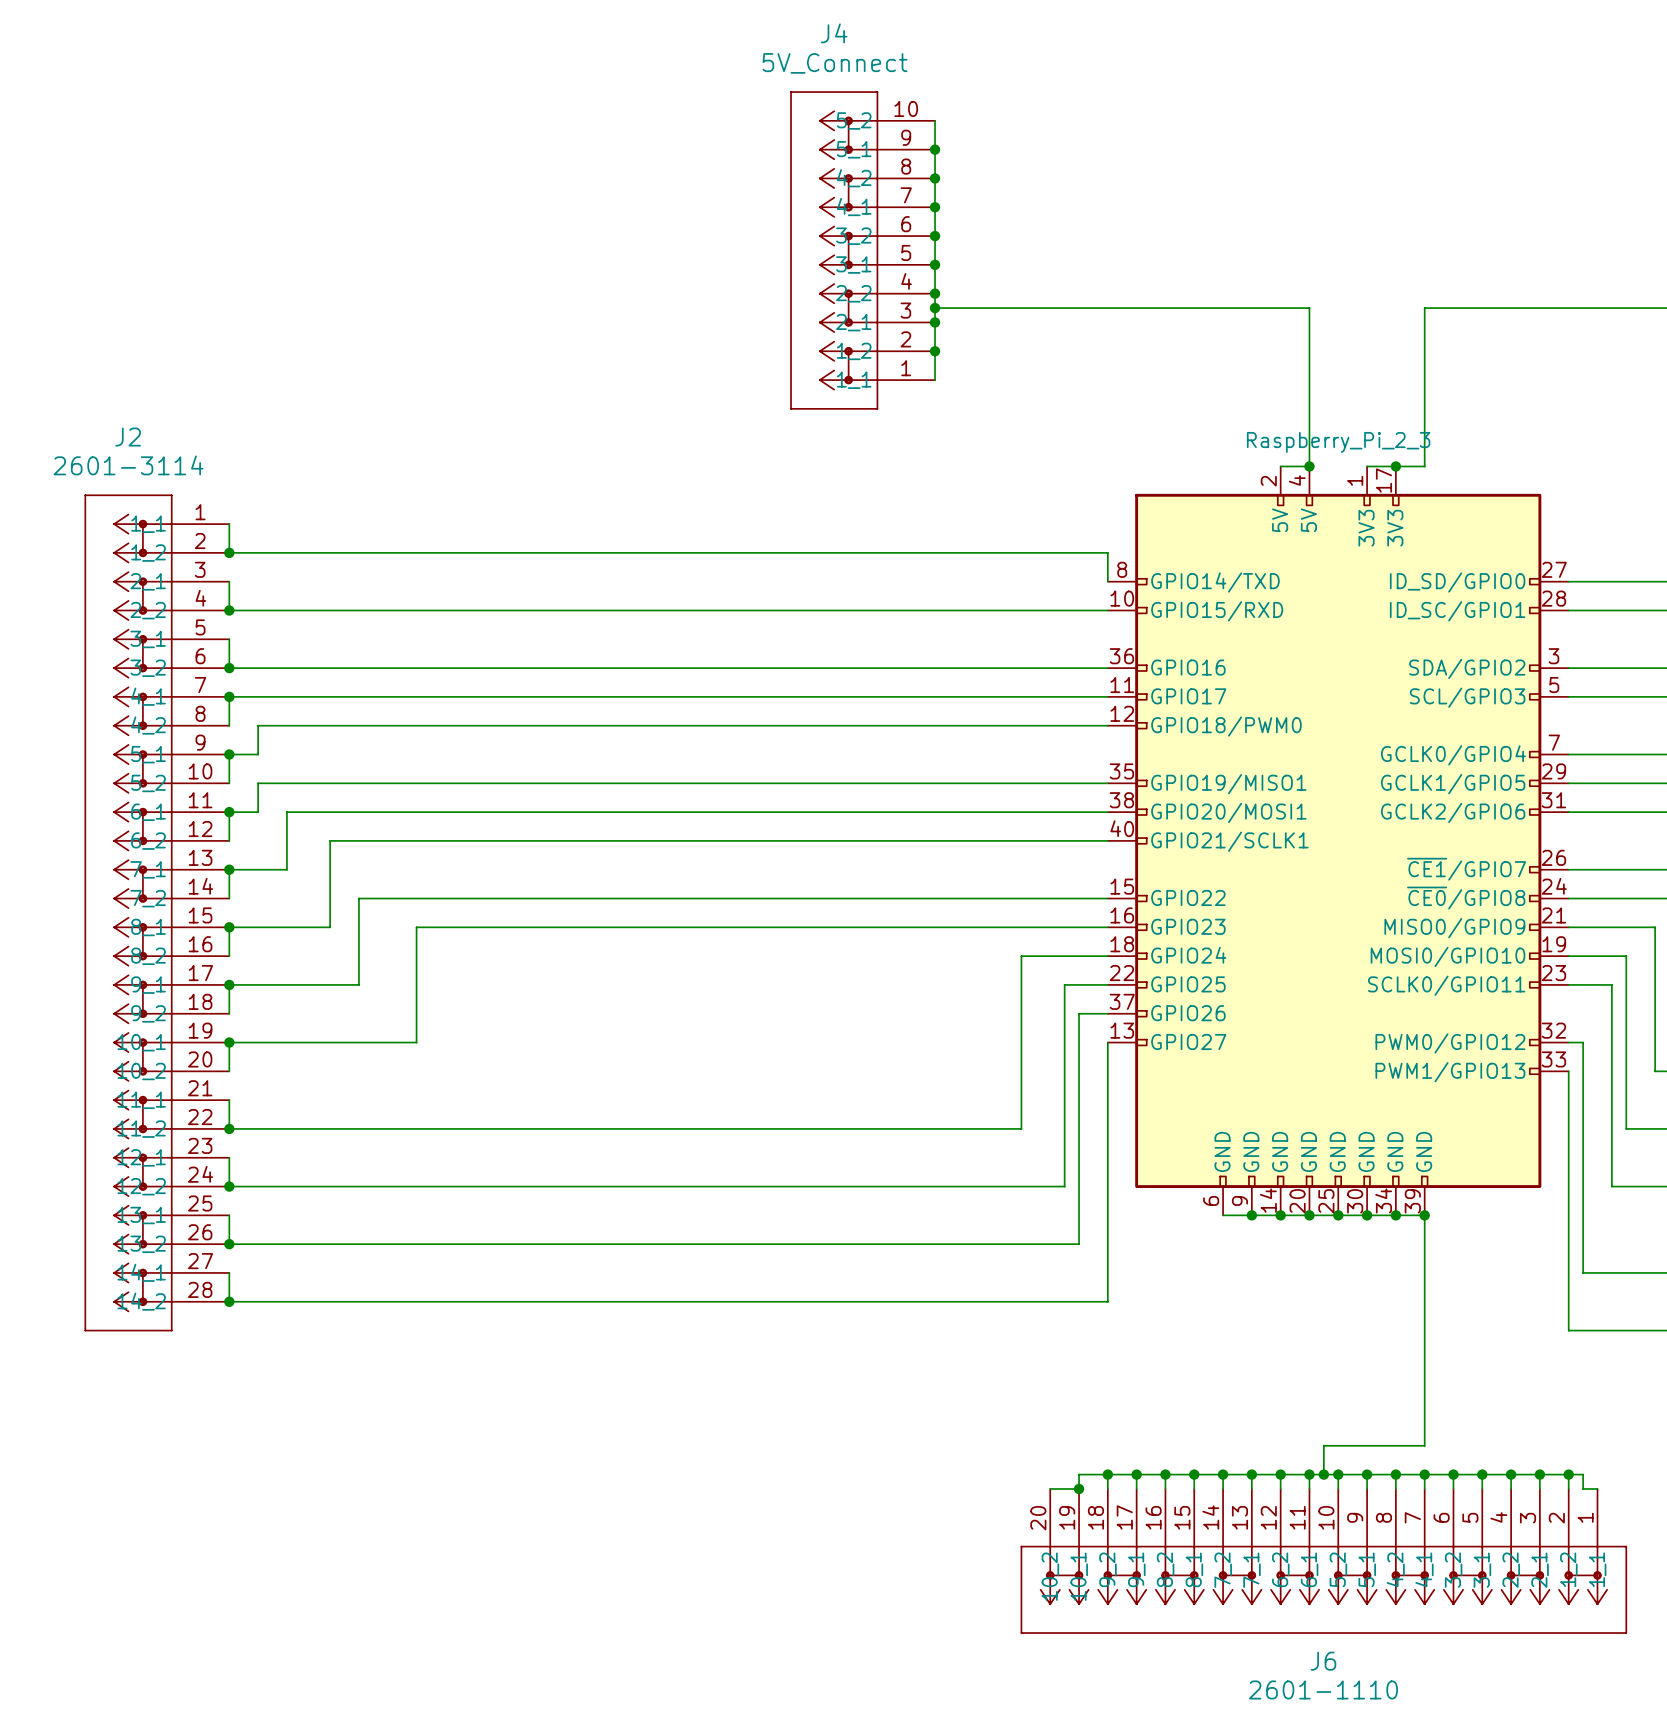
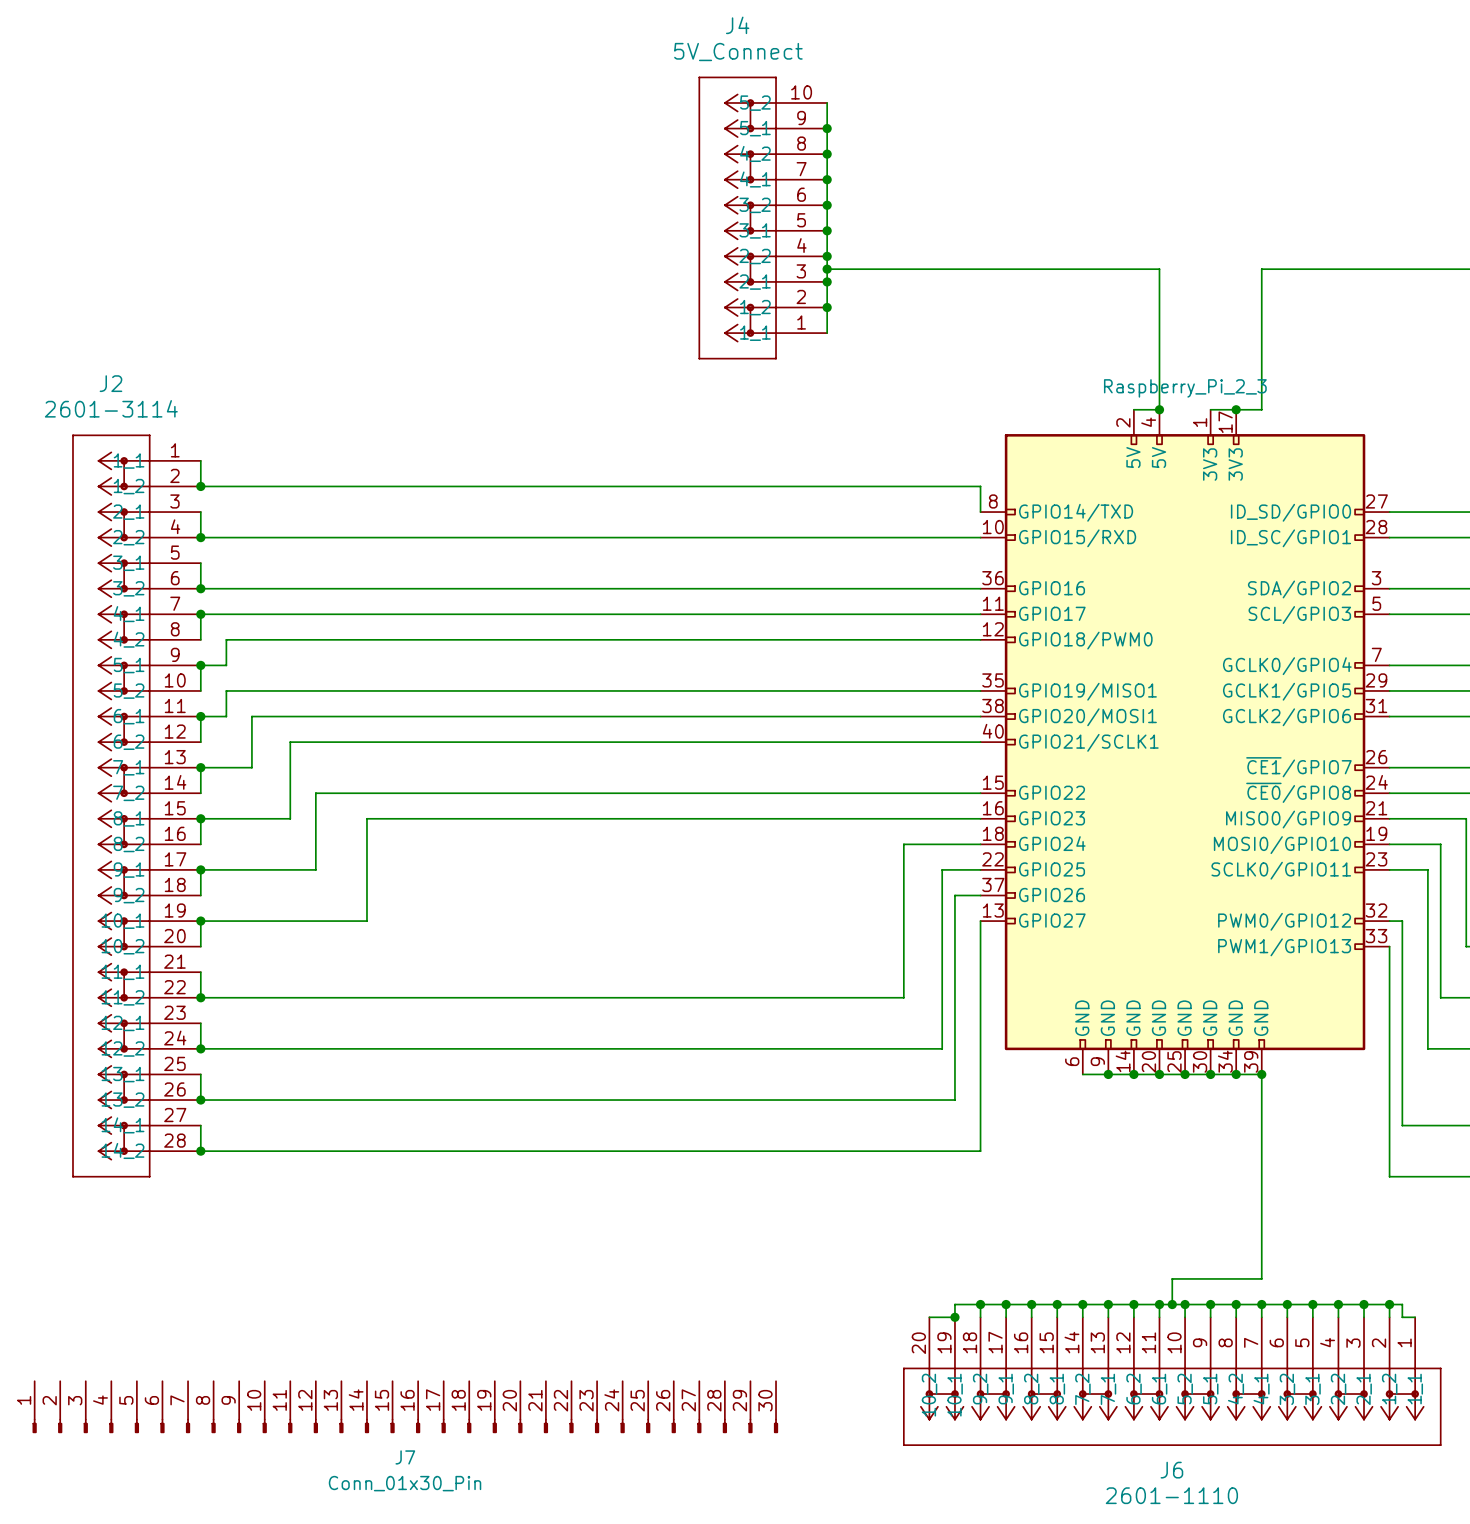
J7: none -> Conn_01x30_Pin (405, 1407)

